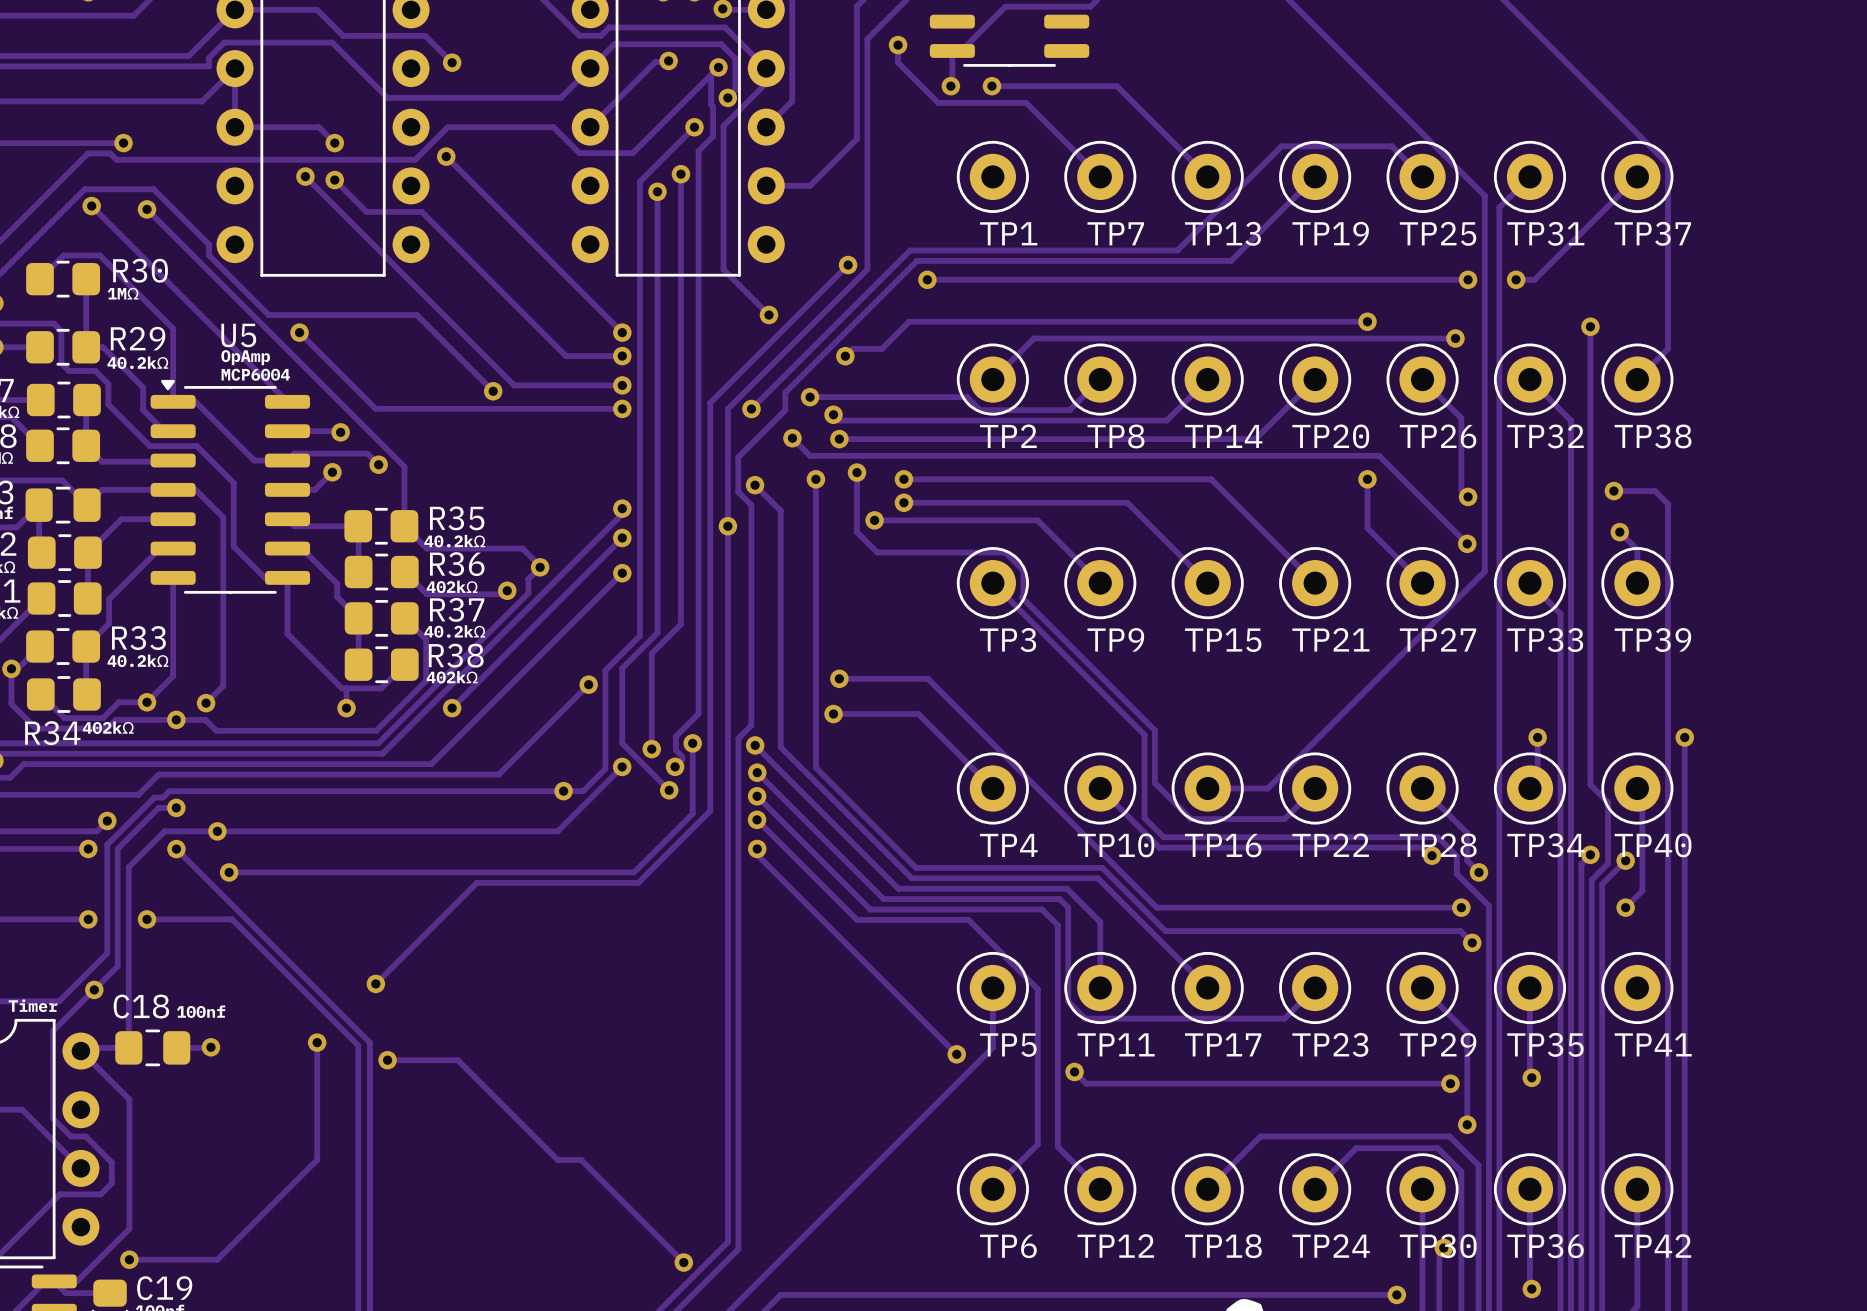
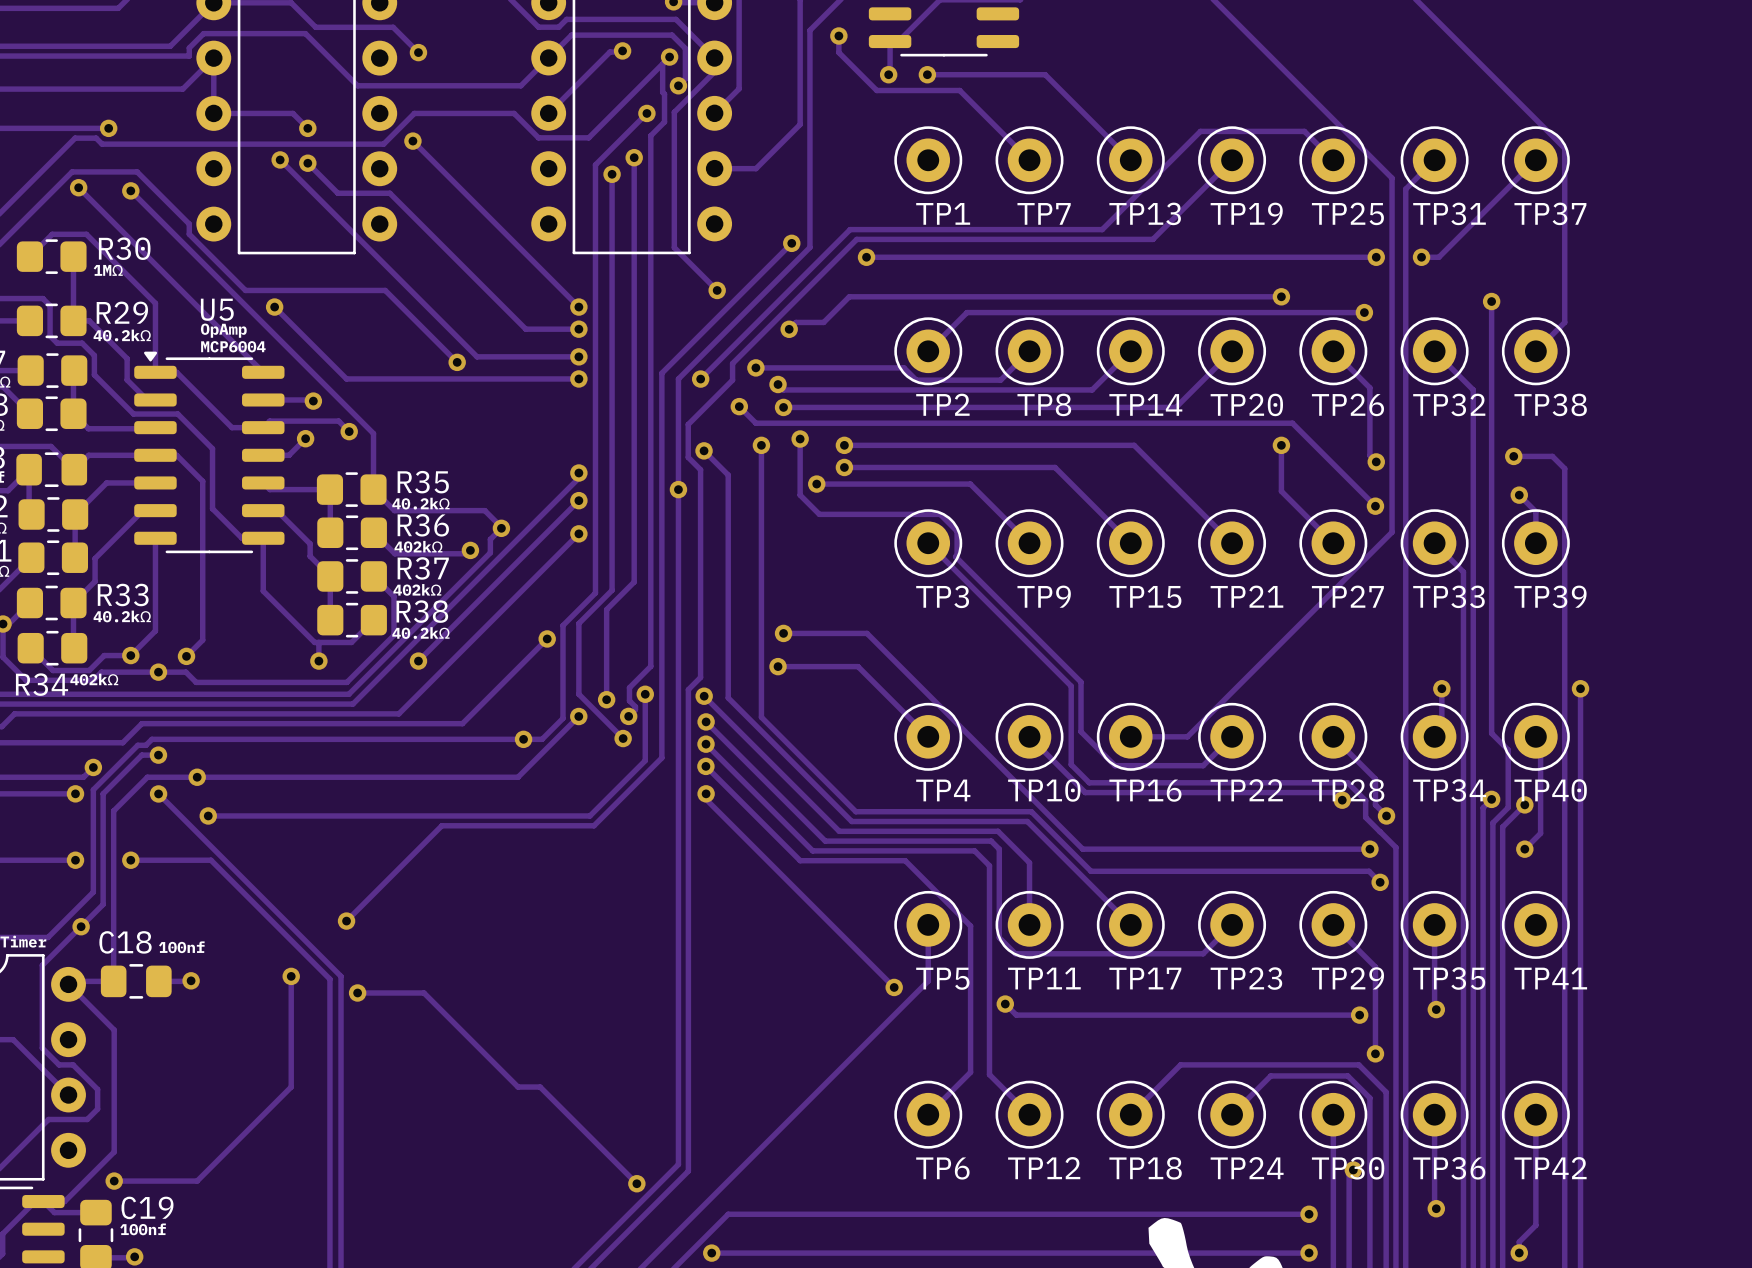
text: 40.2kΩ (454, 631) -> 402kΩ (417, 589)
text: 402kΩ (452, 677) -> 40.2kΩ (420, 633)

